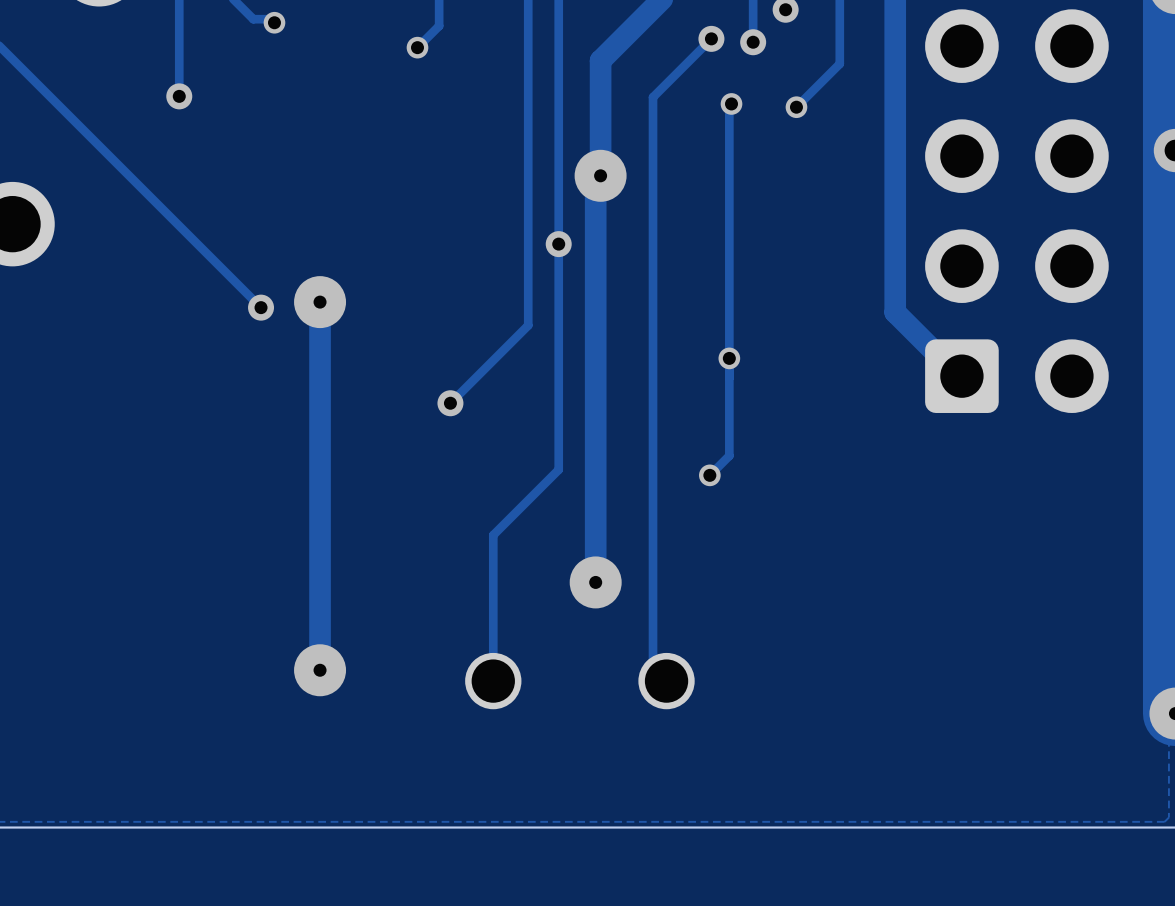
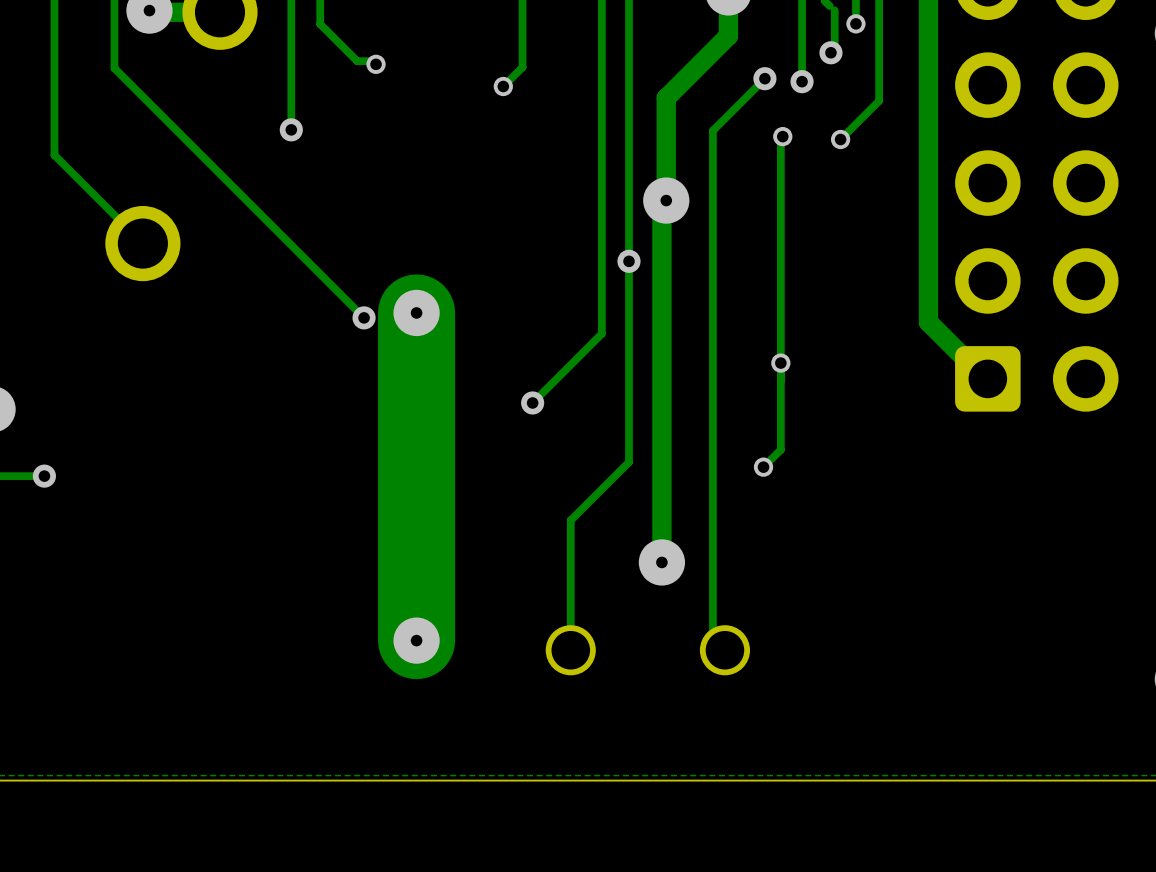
track width: thin (320, 302) (320, 670) -> thick (416, 312) (416, 640)

